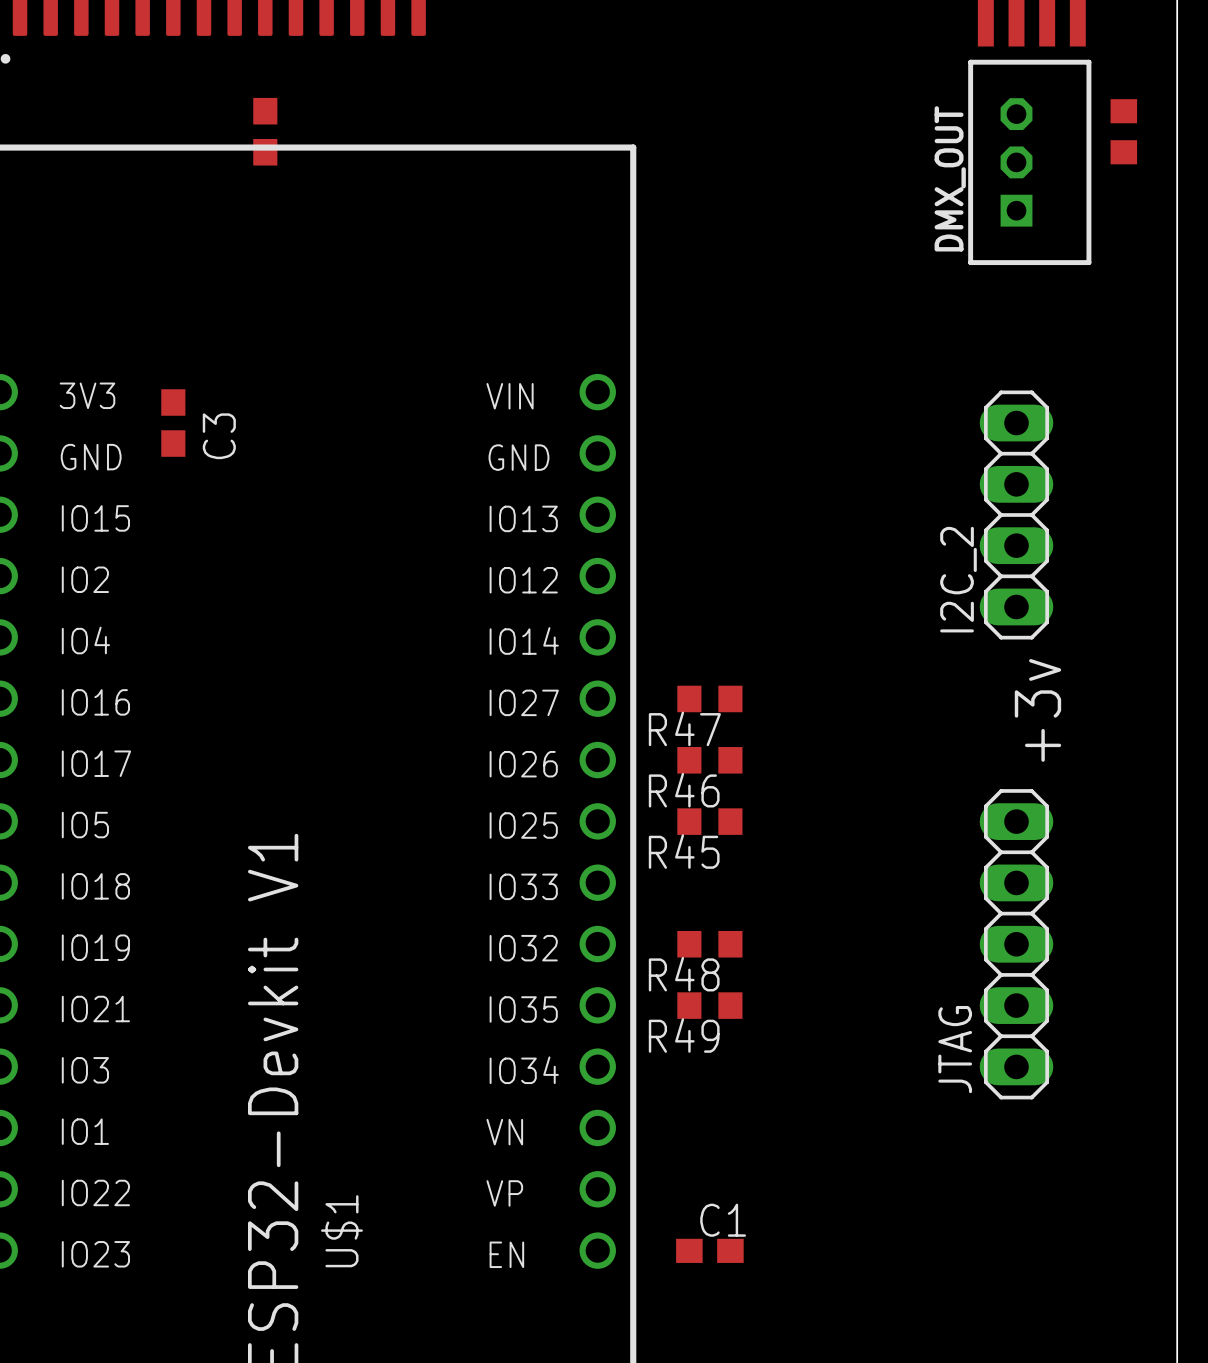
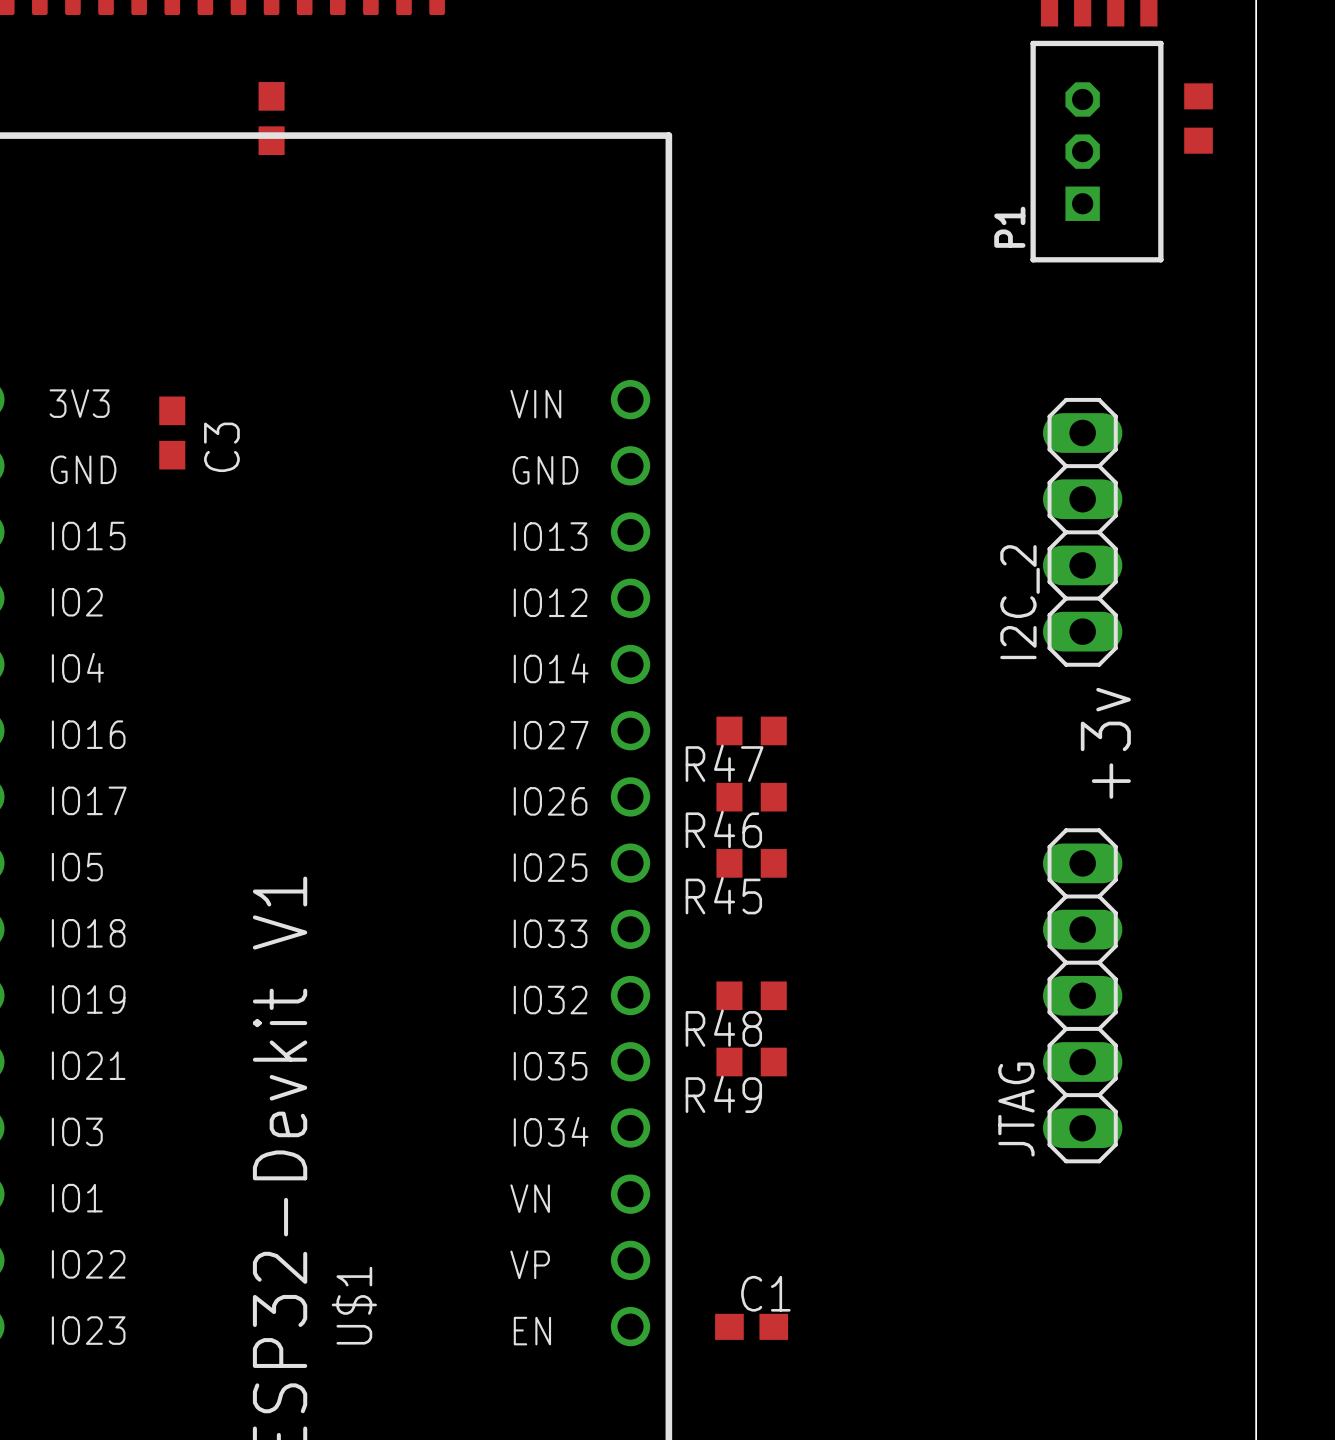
DMX_OUT name: DMX_OUT (950, 178) -> P1 (1009, 227)

